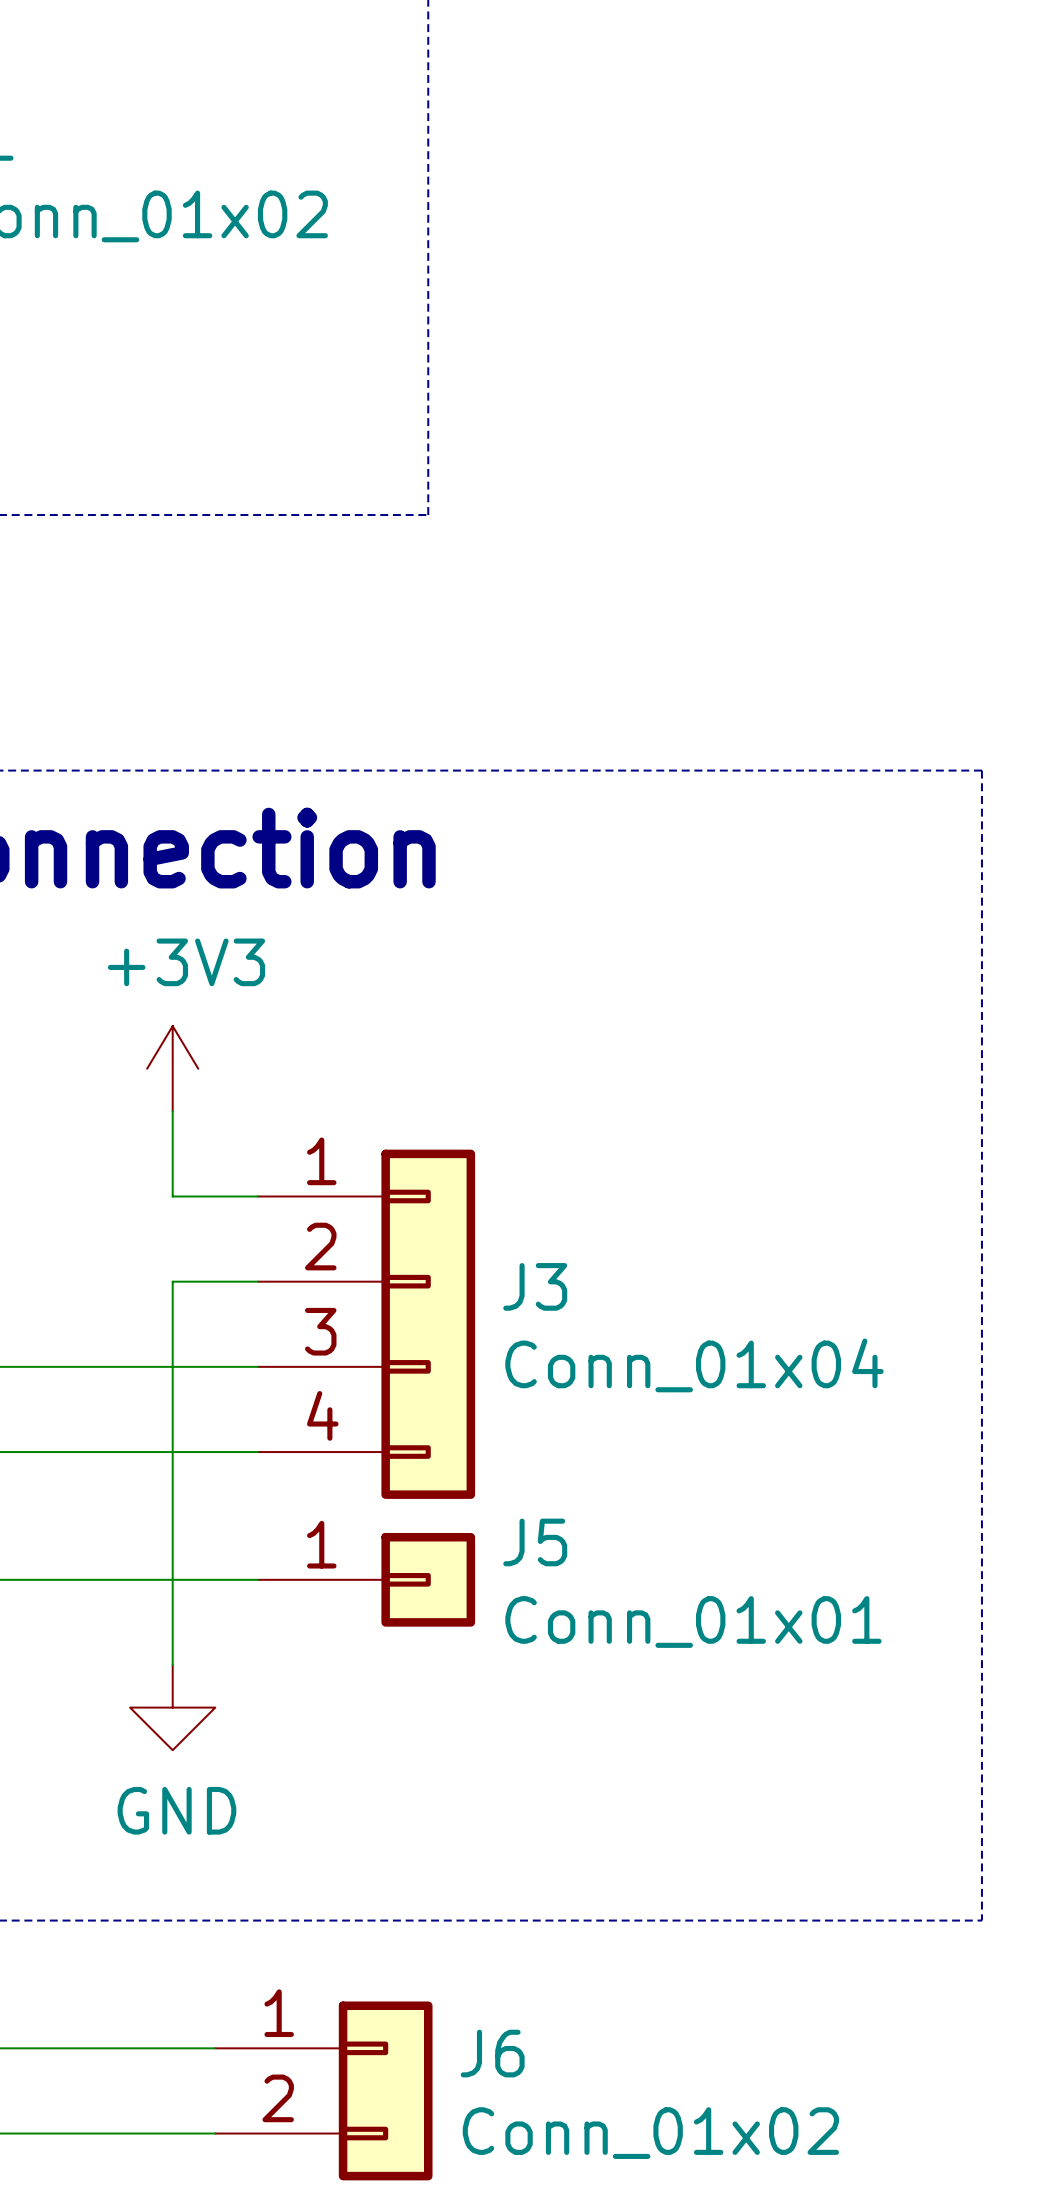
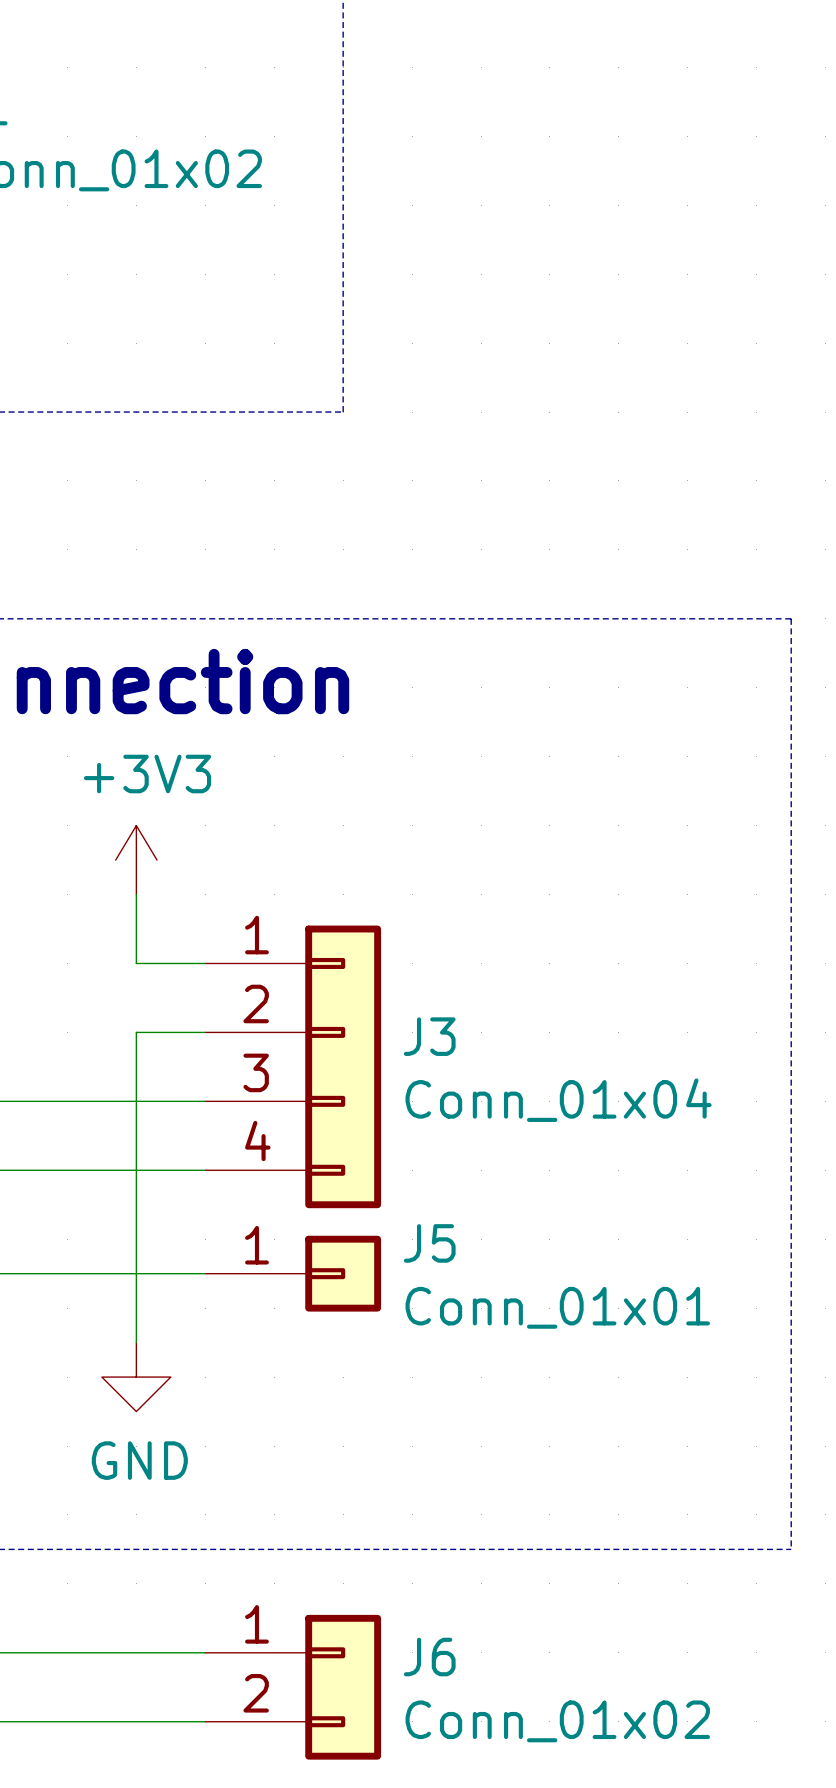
J6 position: (323, 2090) -> (293, 1687)

